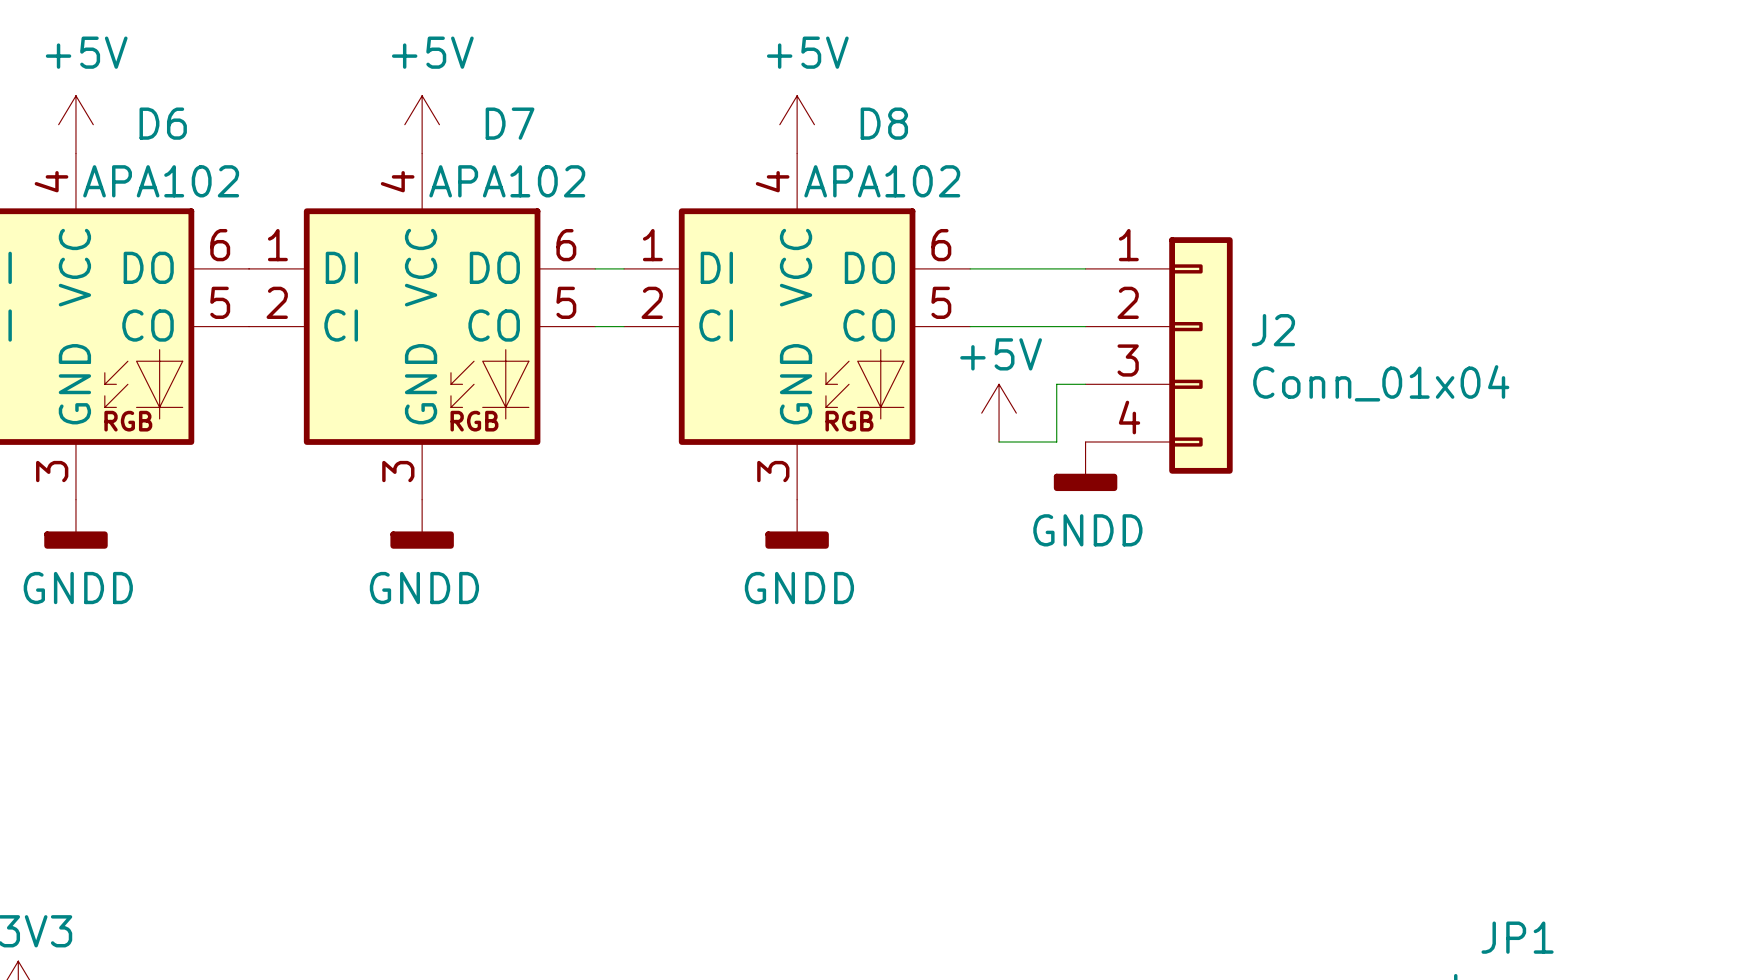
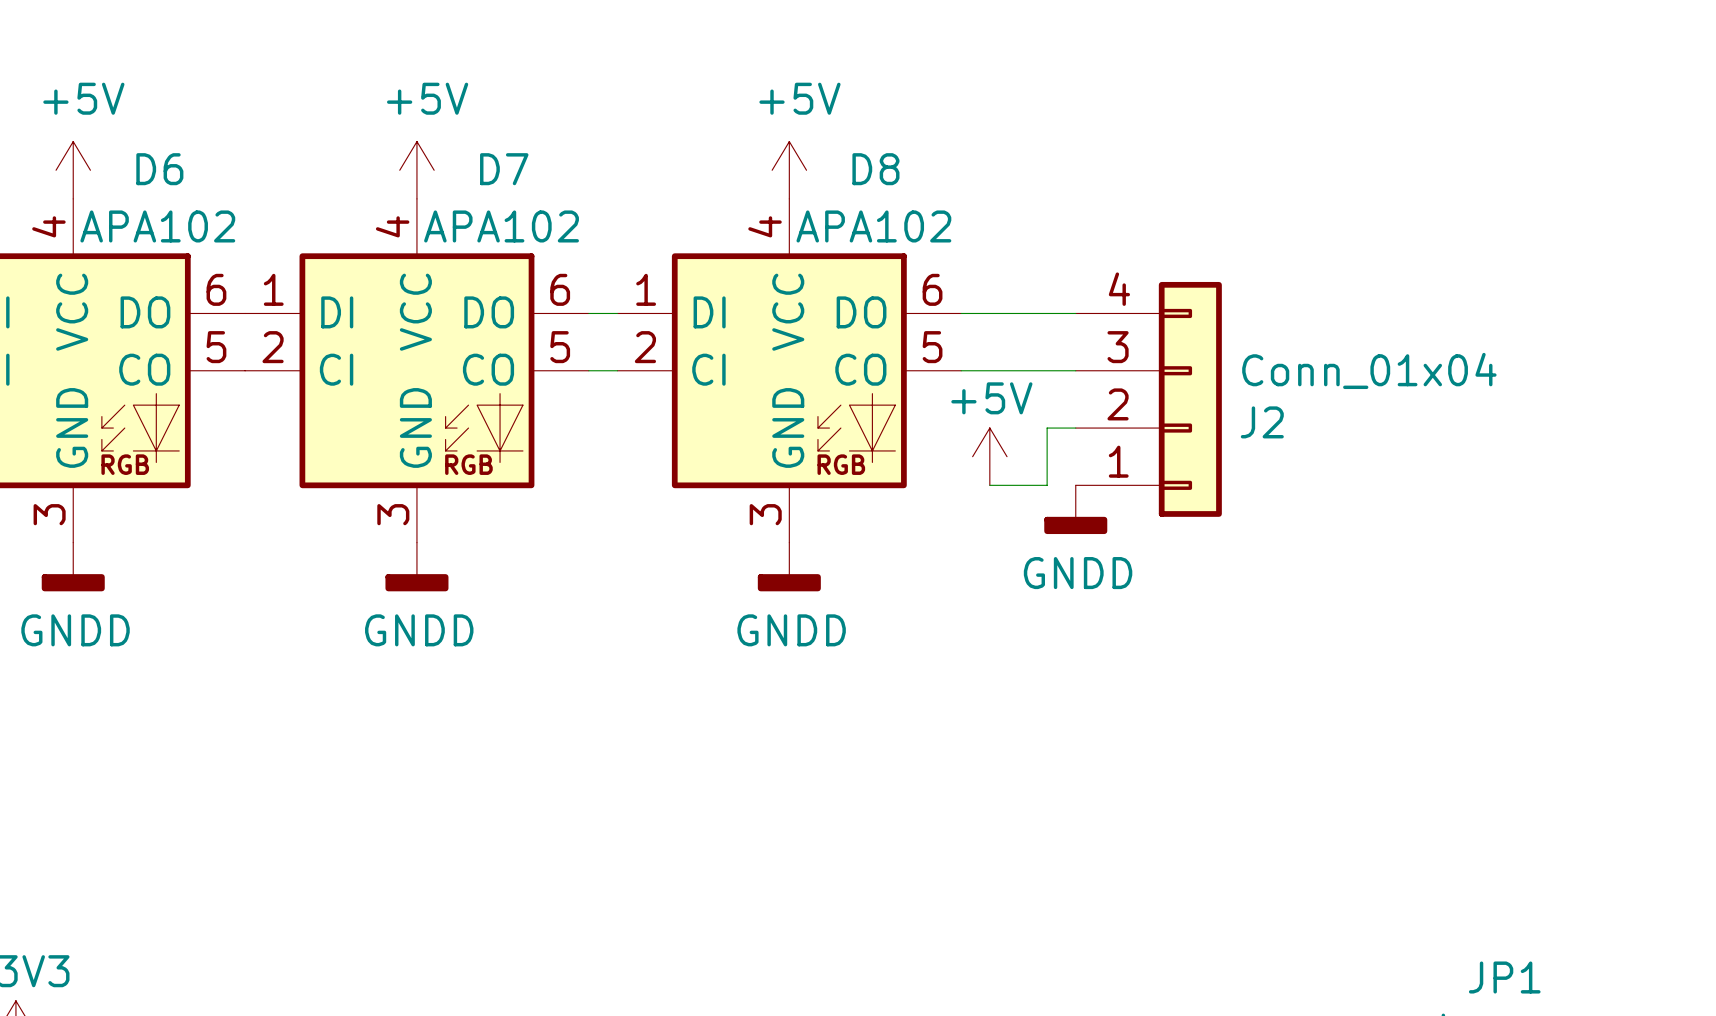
J2 flip: as is (1200, 355) -> up-down (1190, 399)

